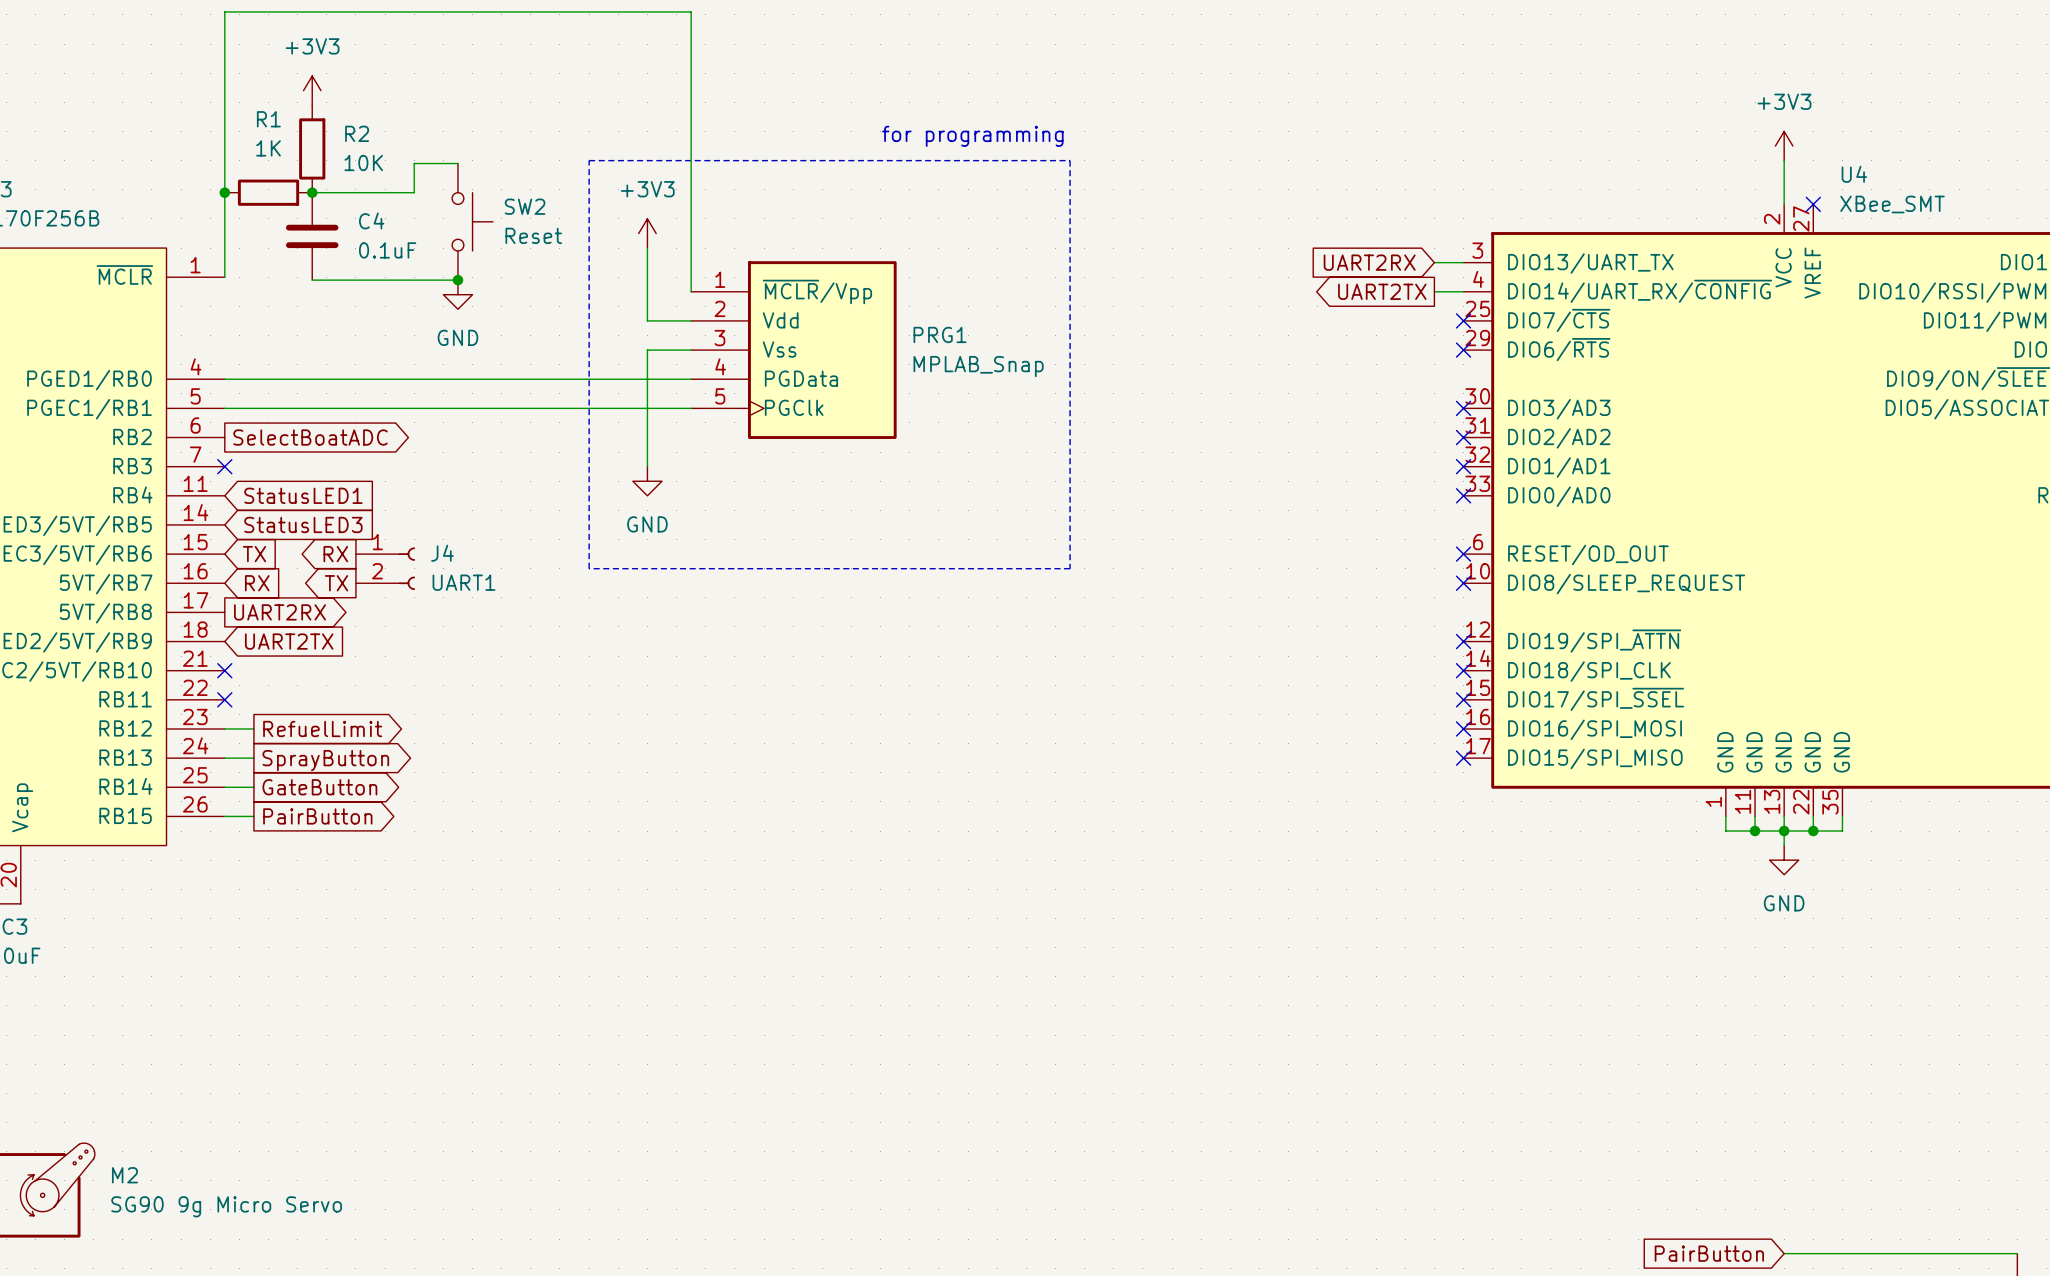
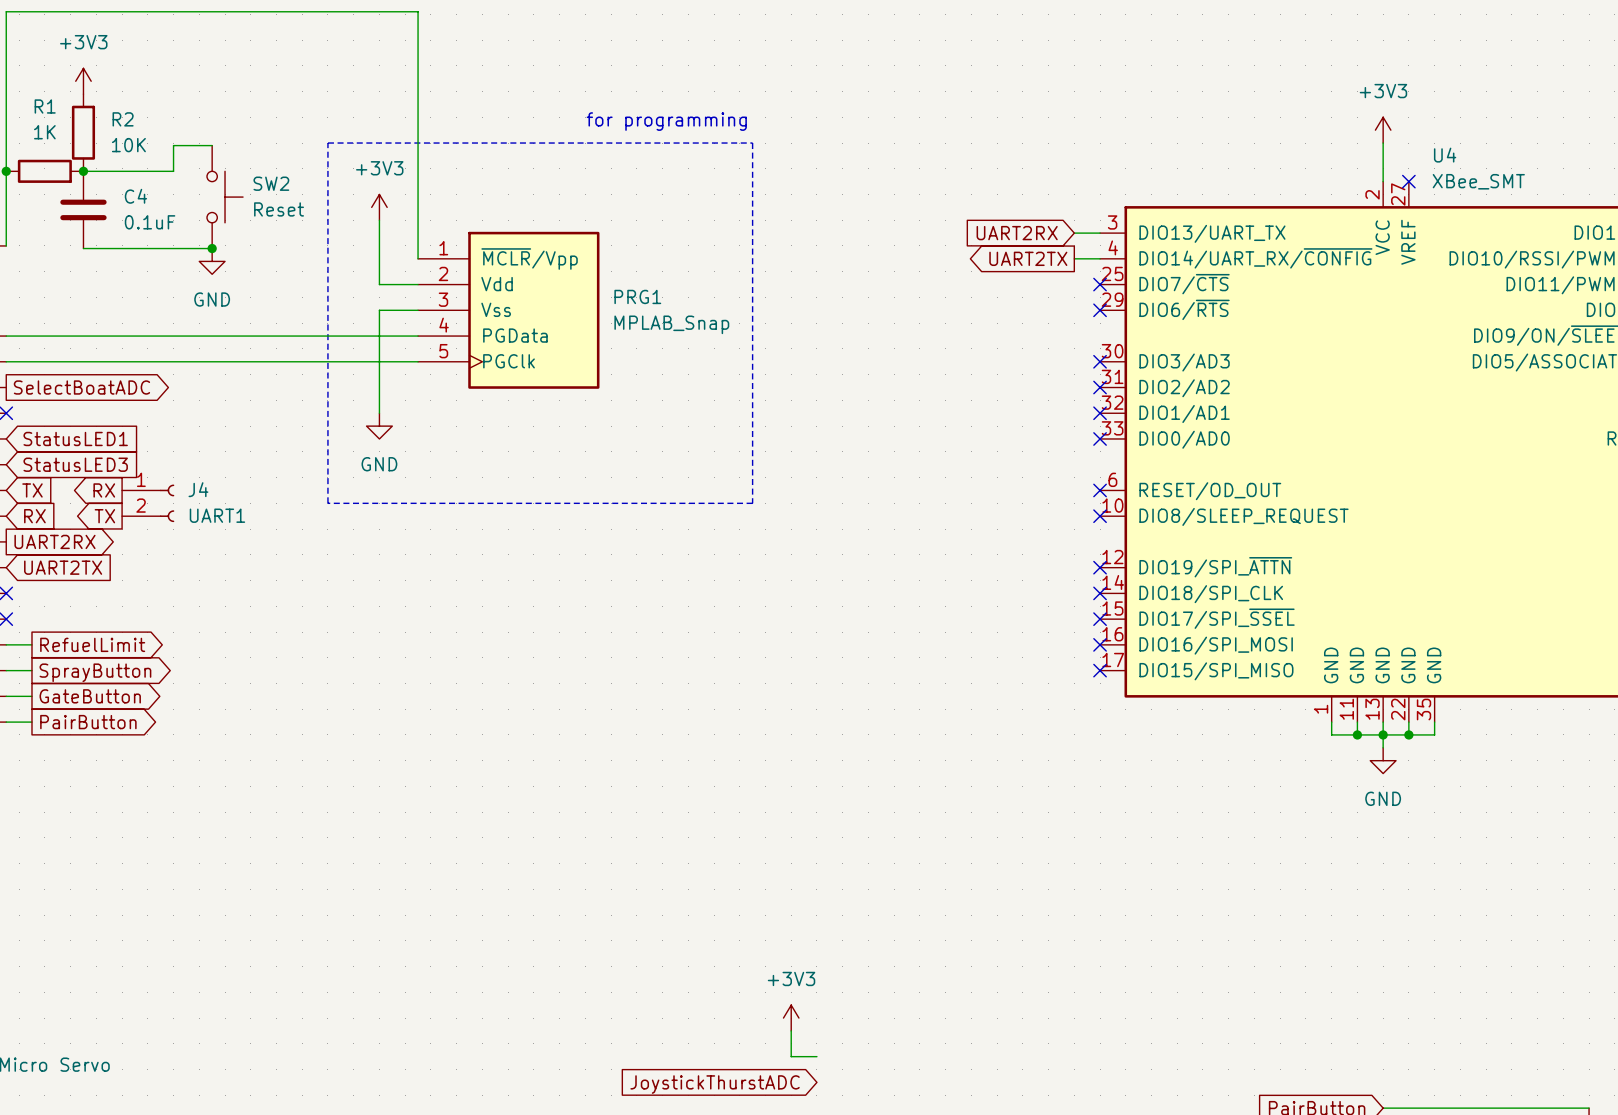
power symbol: none -> +3V3 (791, 1018)
wire: none -> (791, 1030) (791, 1056) (816, 1056)
global label: none -> JoystickThurstADC (715, 1084)

